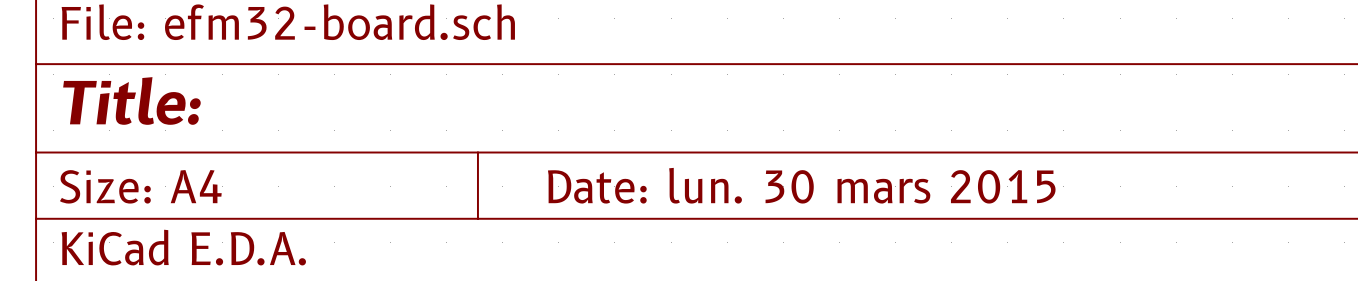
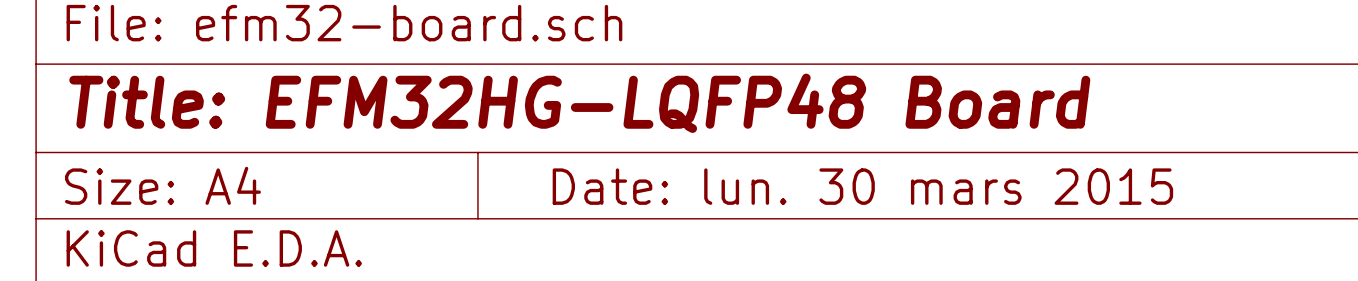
title block: Title: (131, 100) -> Title: EFM32HG-LQFP48 Board (579, 103)

